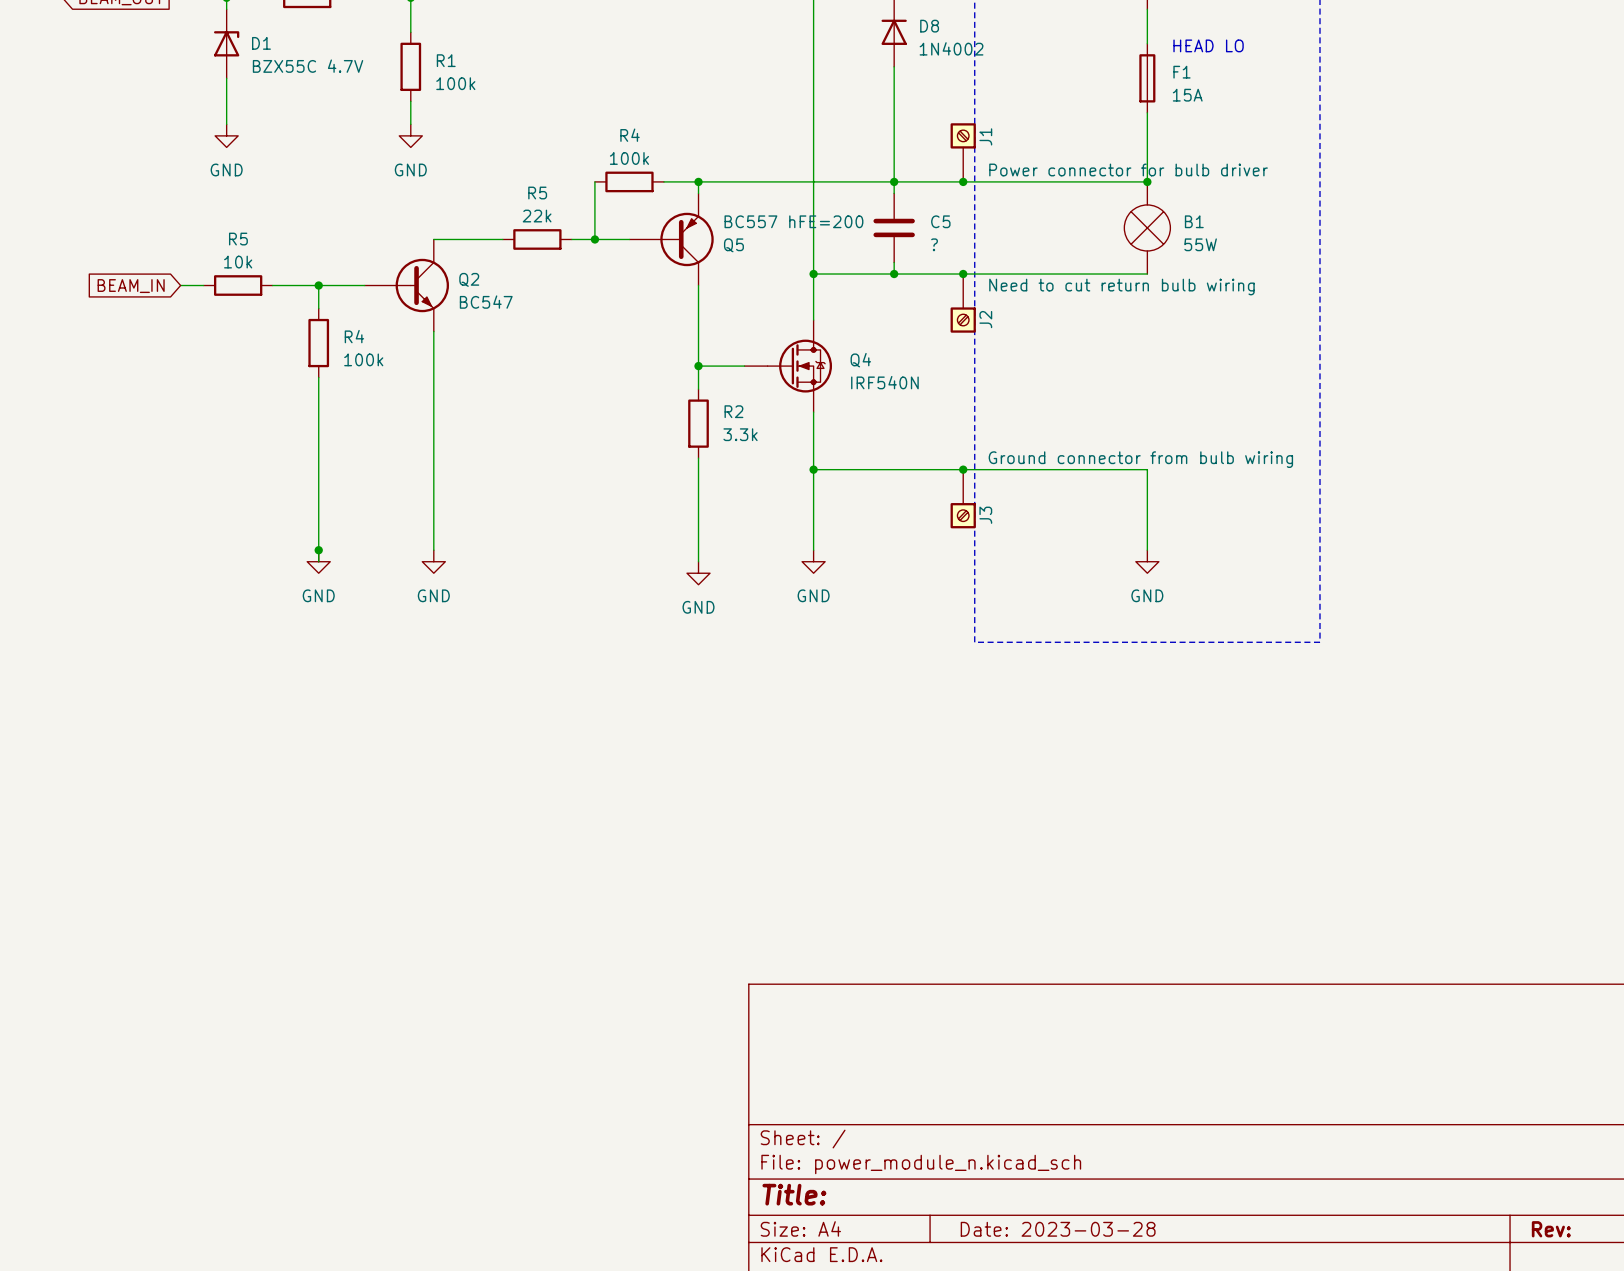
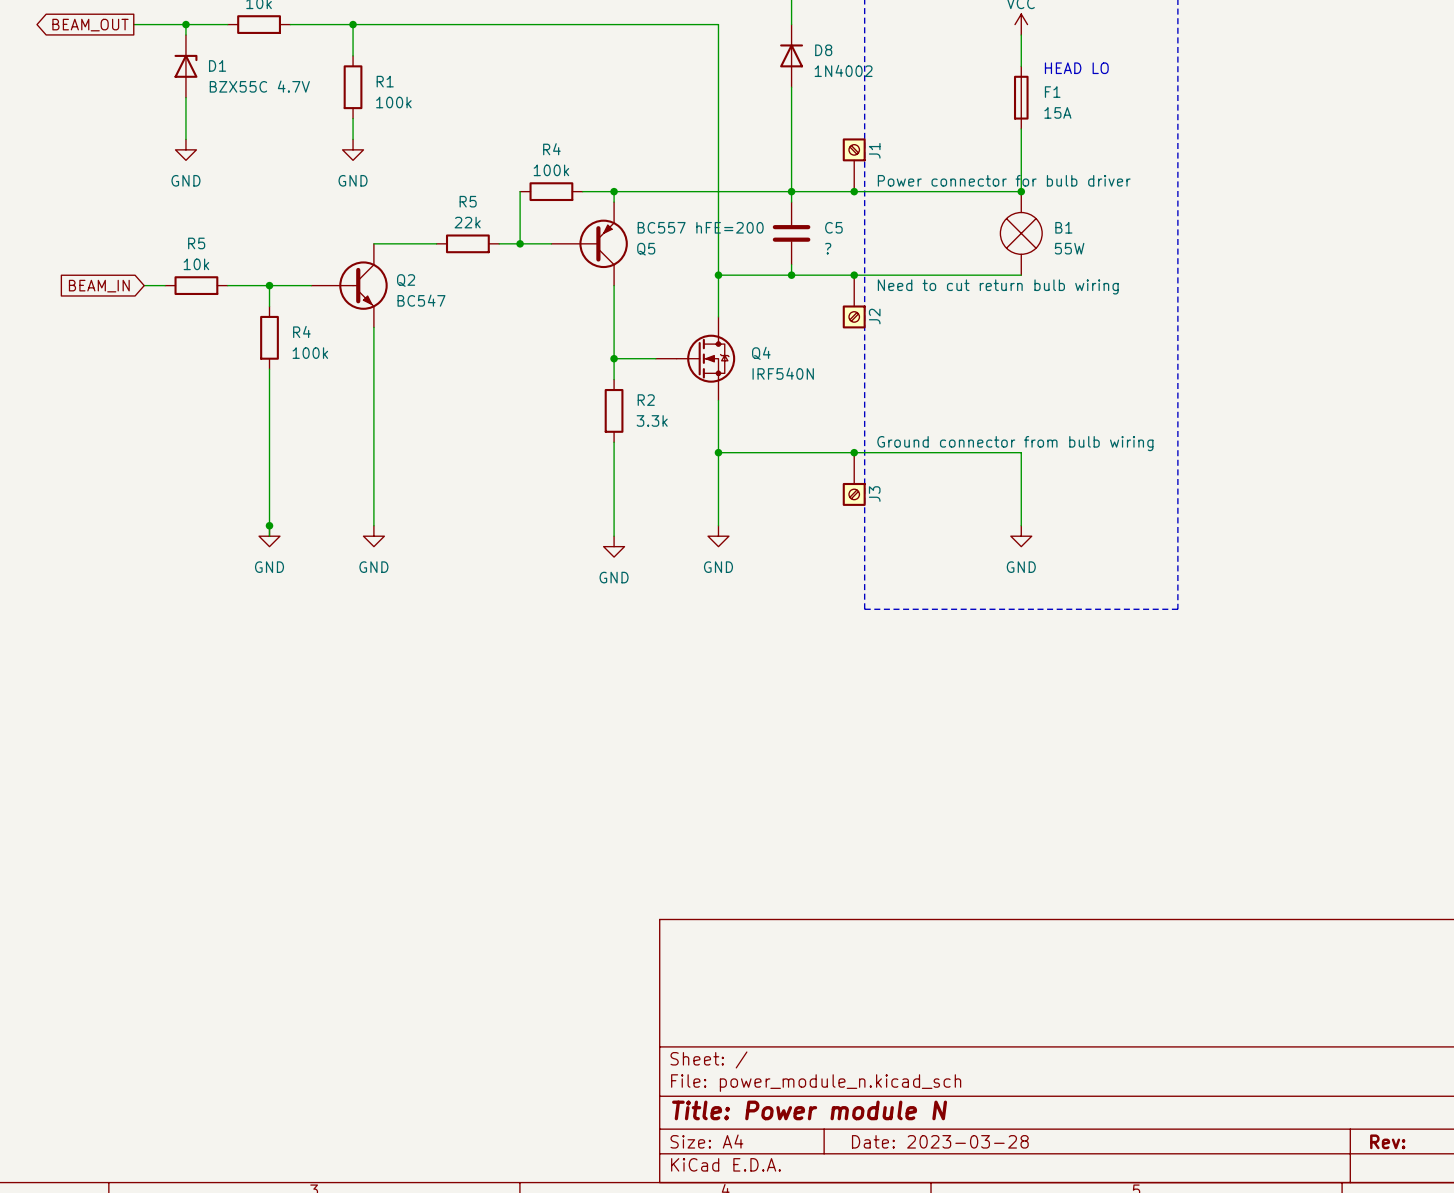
title block: Title: (794, 1194) -> Title: Power module N (809, 1110)

